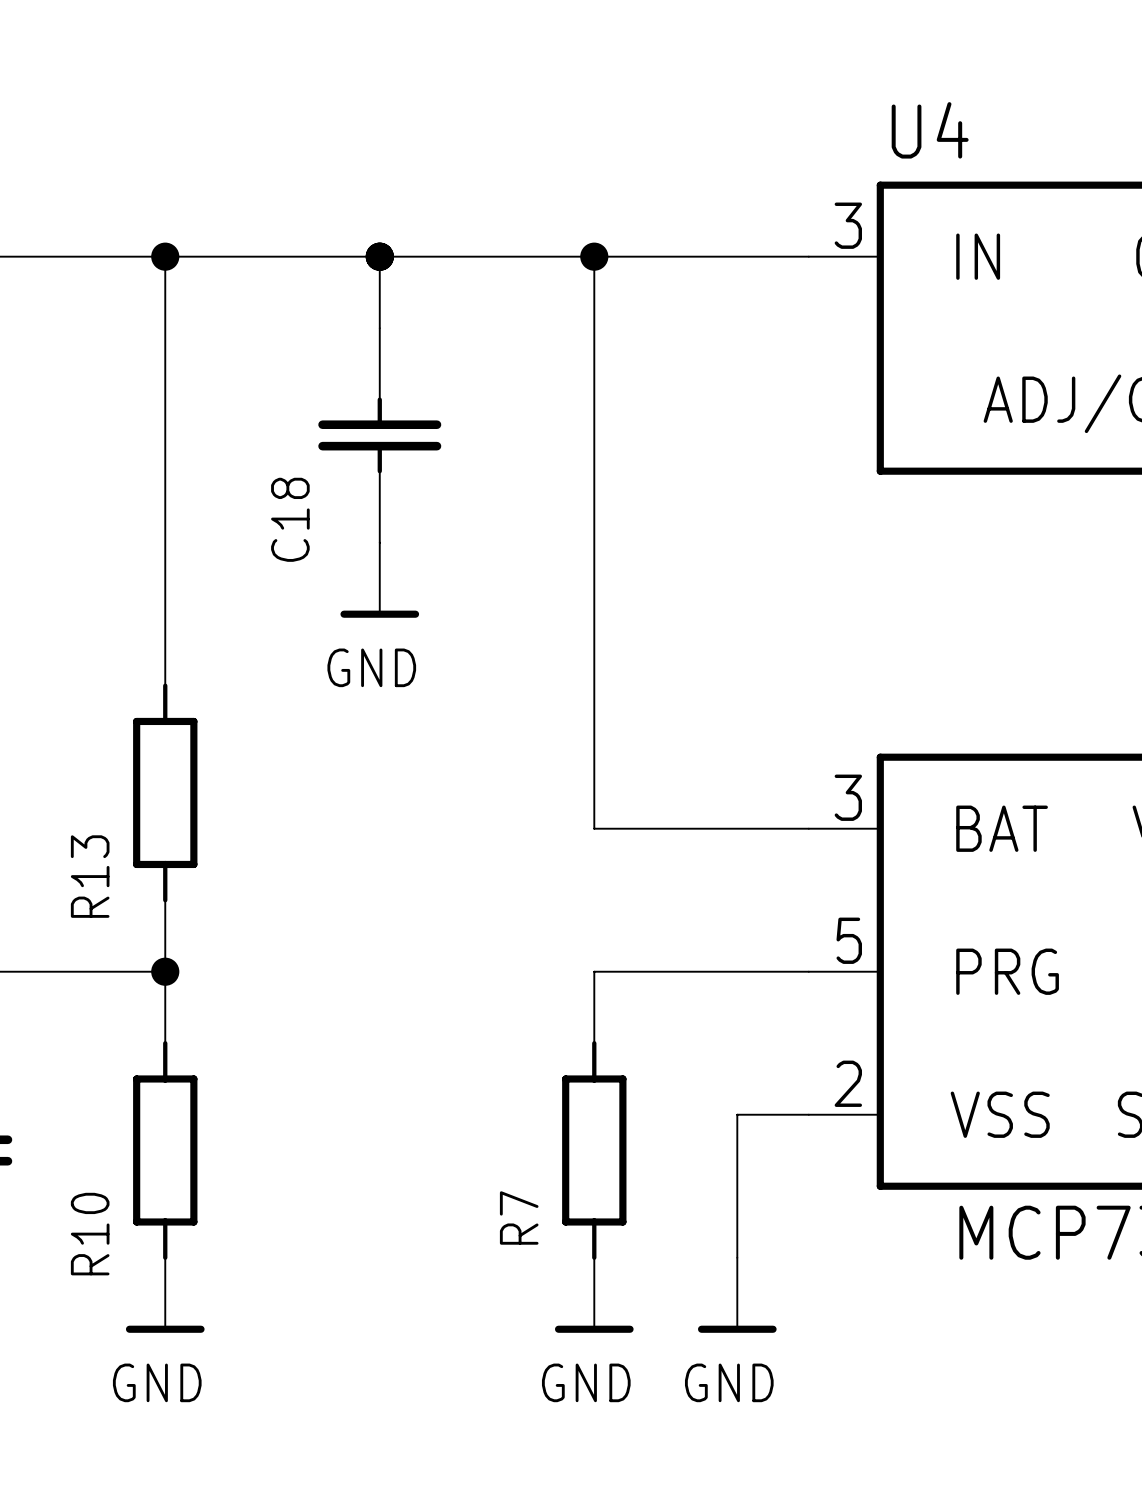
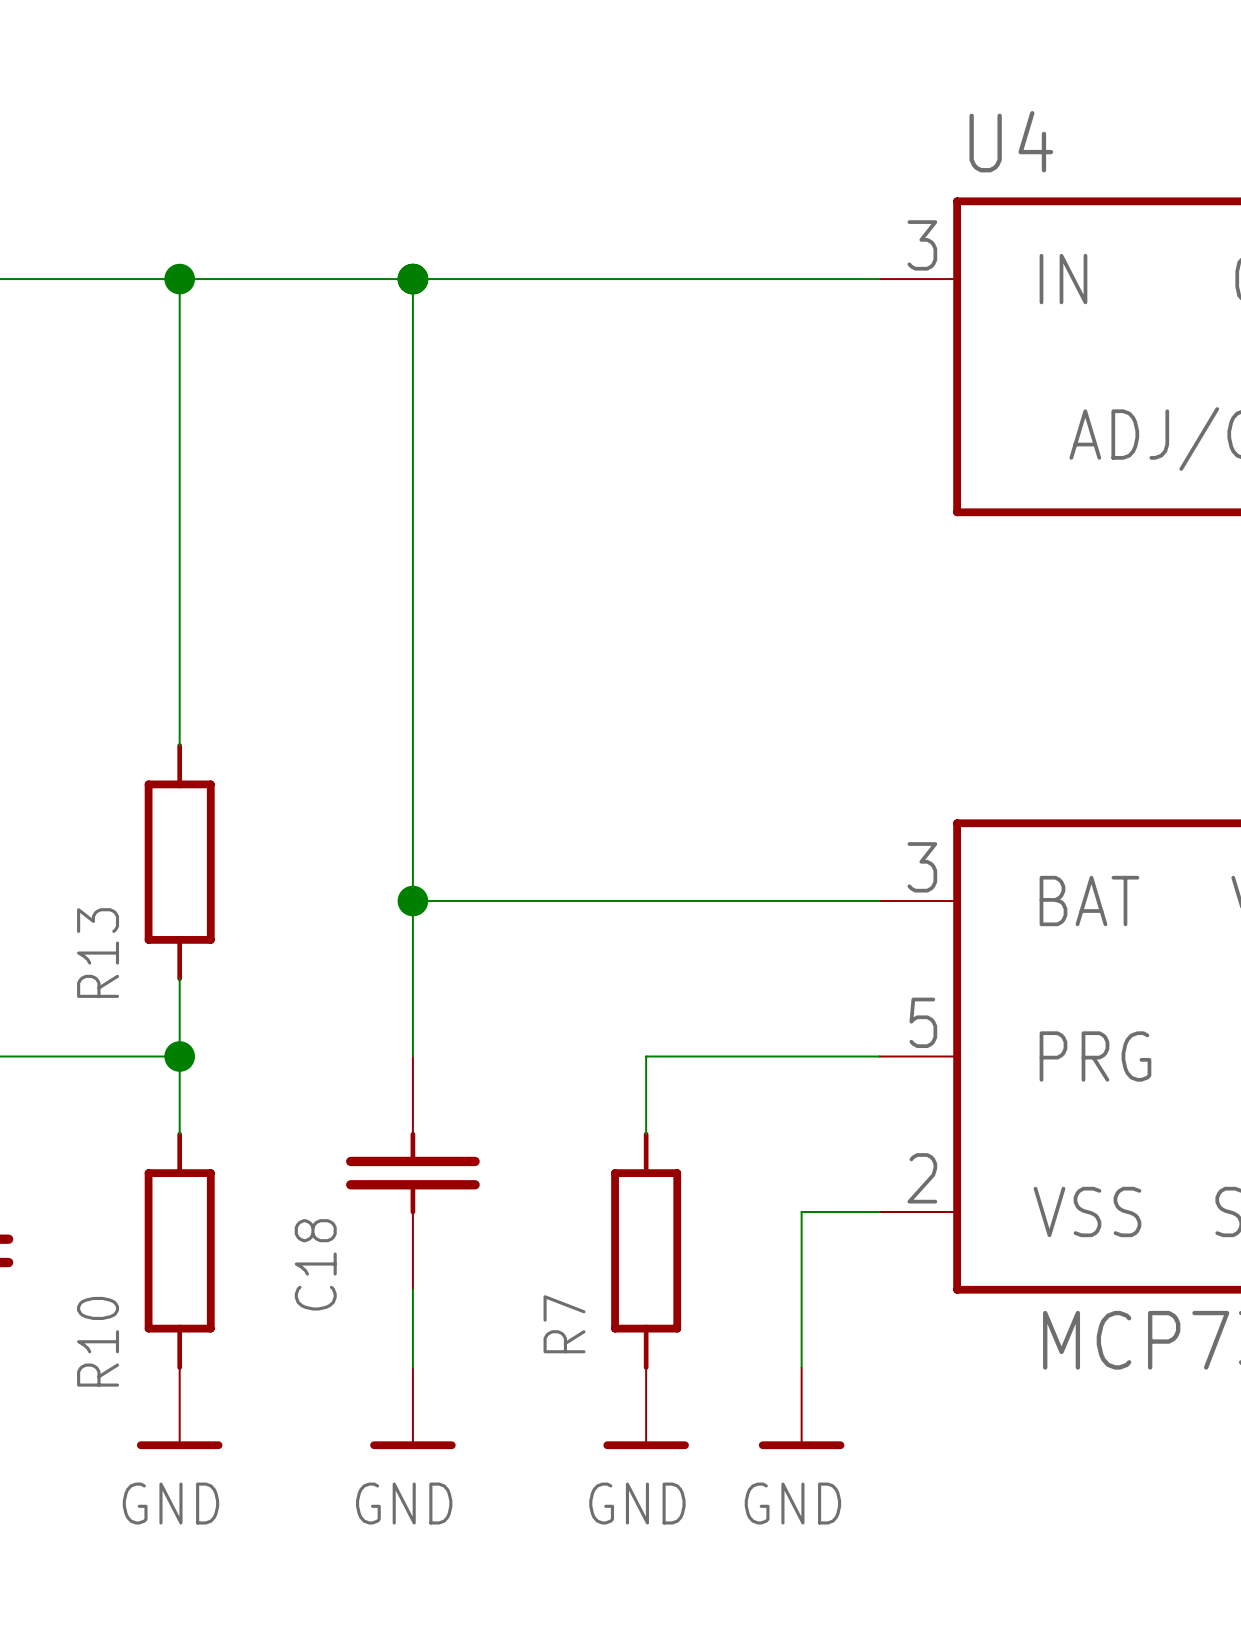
wire: (594, 256) (594, 828) -> (412, 901) (646, 901)
junction: (594, 256) -> none
wire: none -> (412, 356) (412, 1056)
C18 position: (379, 435) -> (412, 1173)
power symbol: GND (379, 580) -> none
junction: none -> (412, 901)
wire: none -> (412, 1289) (412, 1367)
power symbol: none -> GND (412, 1408)

